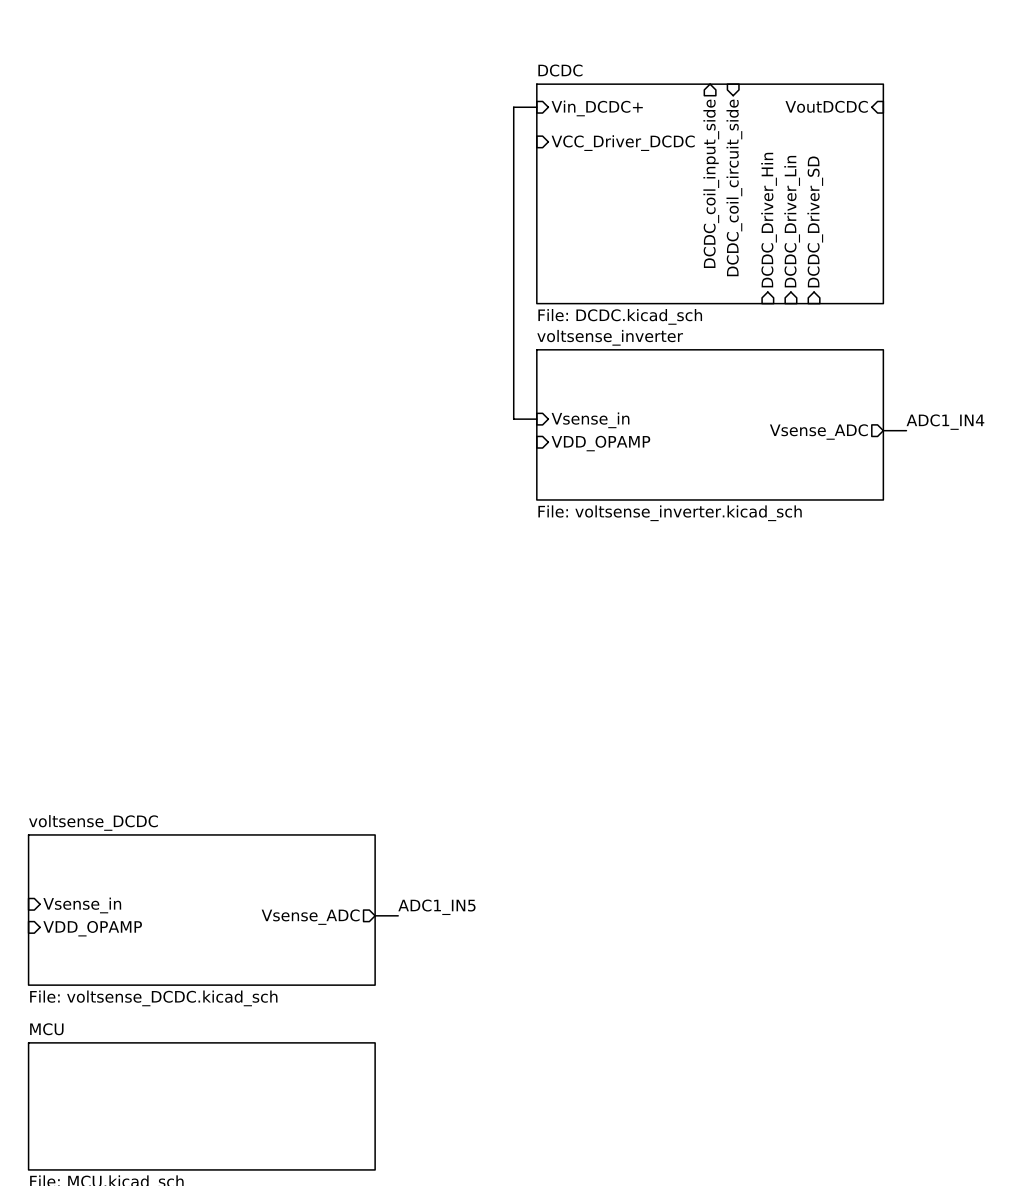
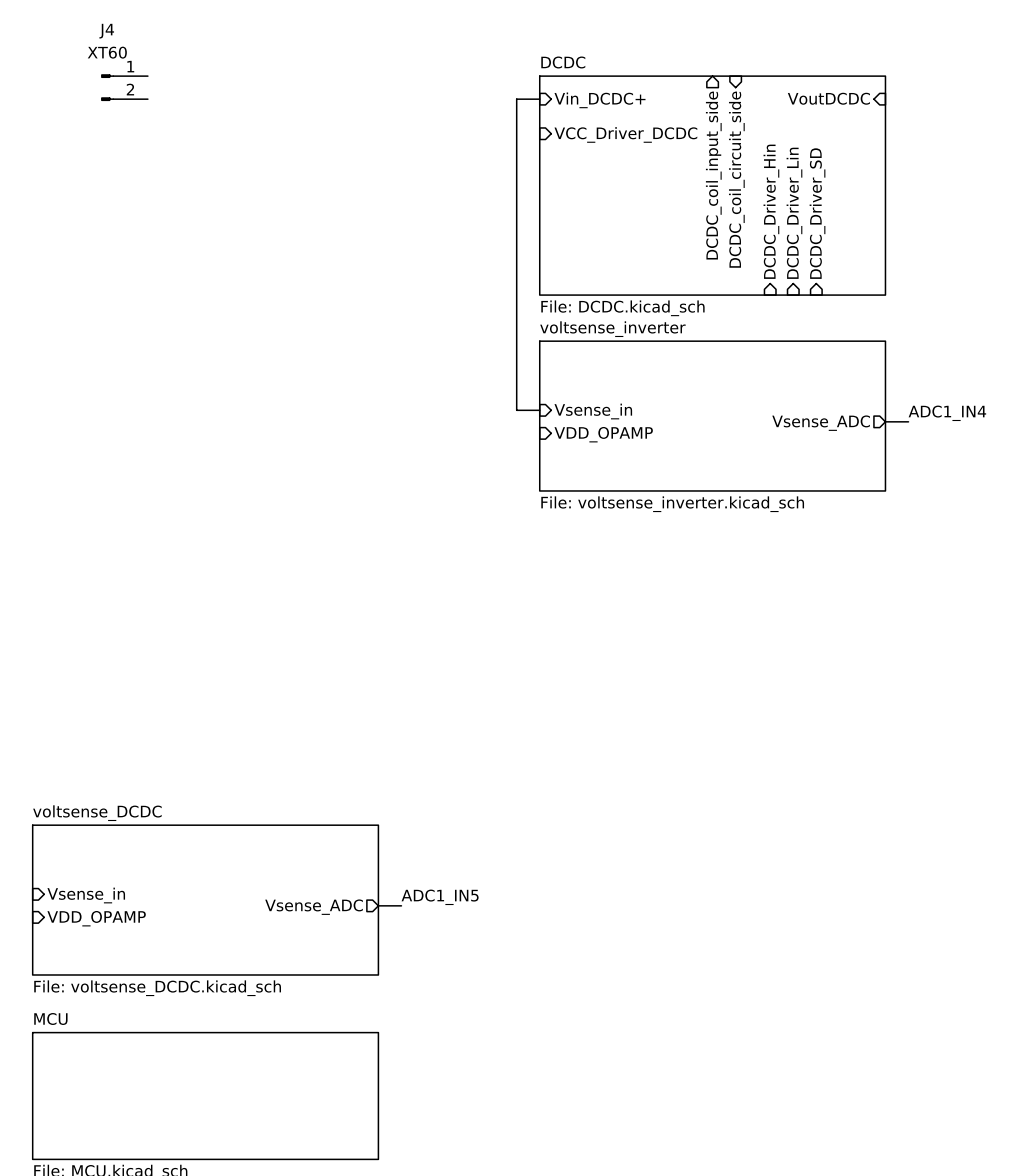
J4: none -> XT60 (124, 87)

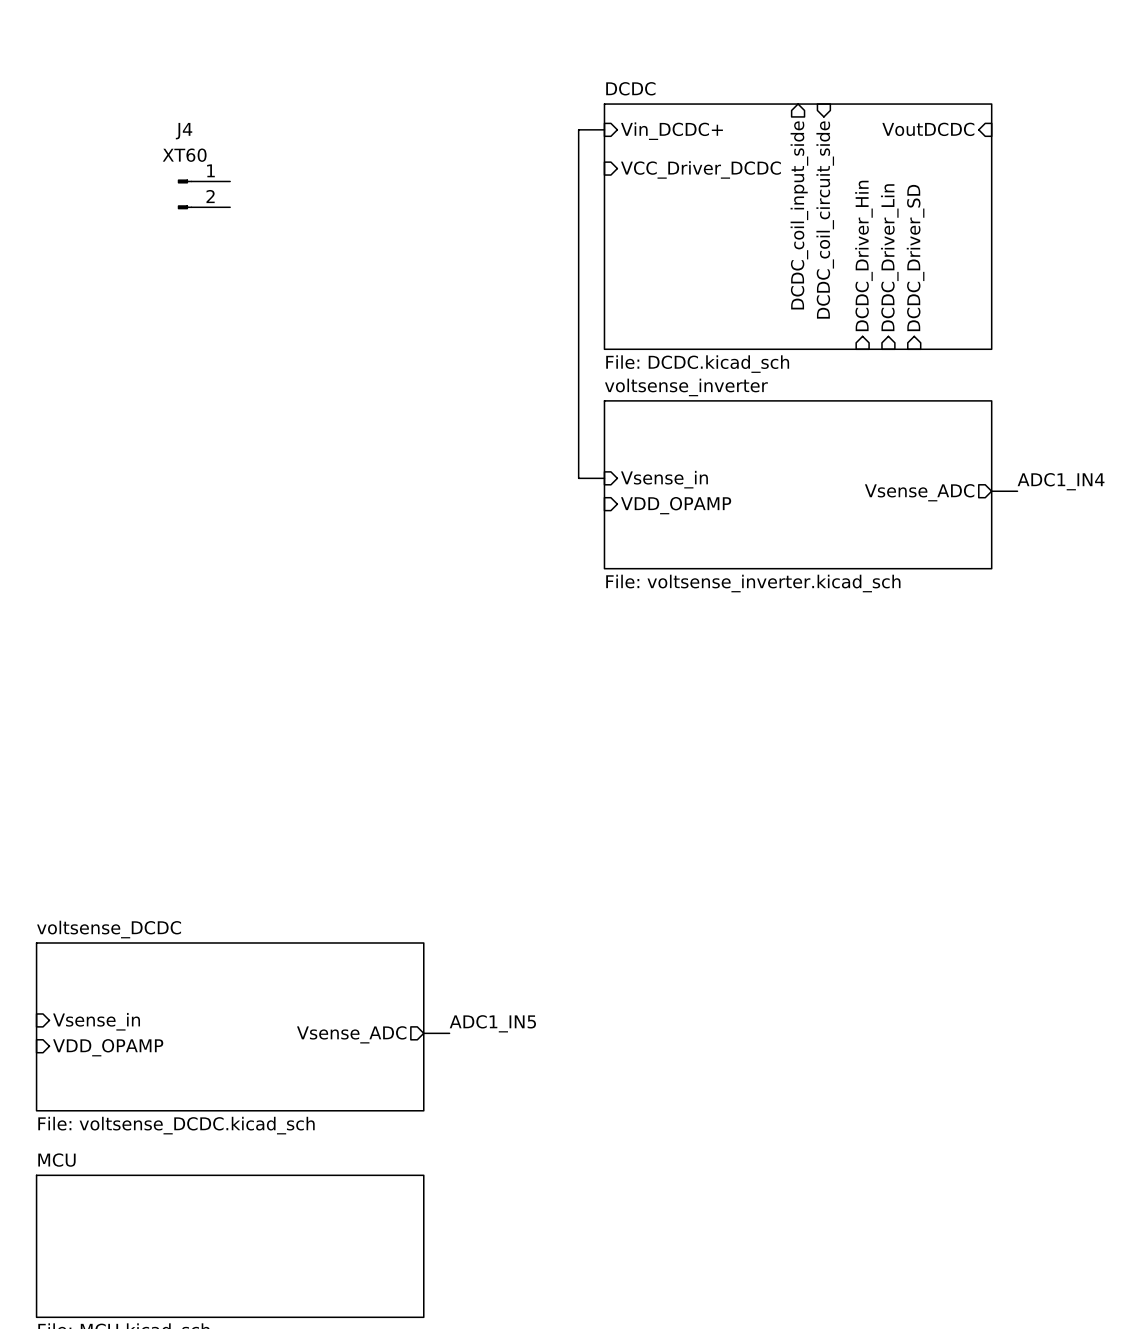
J4 position: (124, 87) -> (203, 194)

